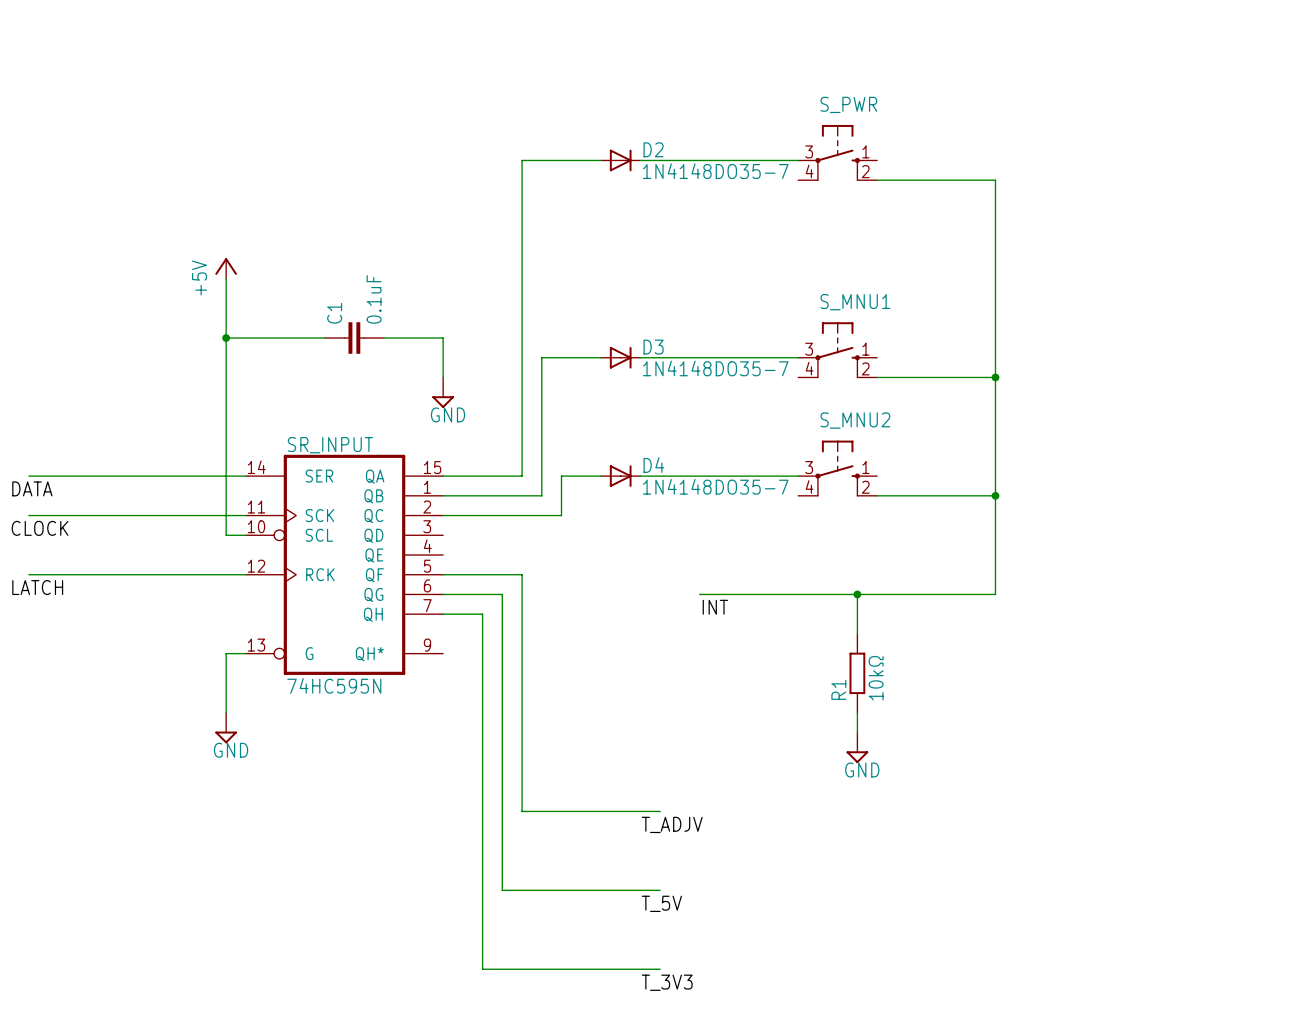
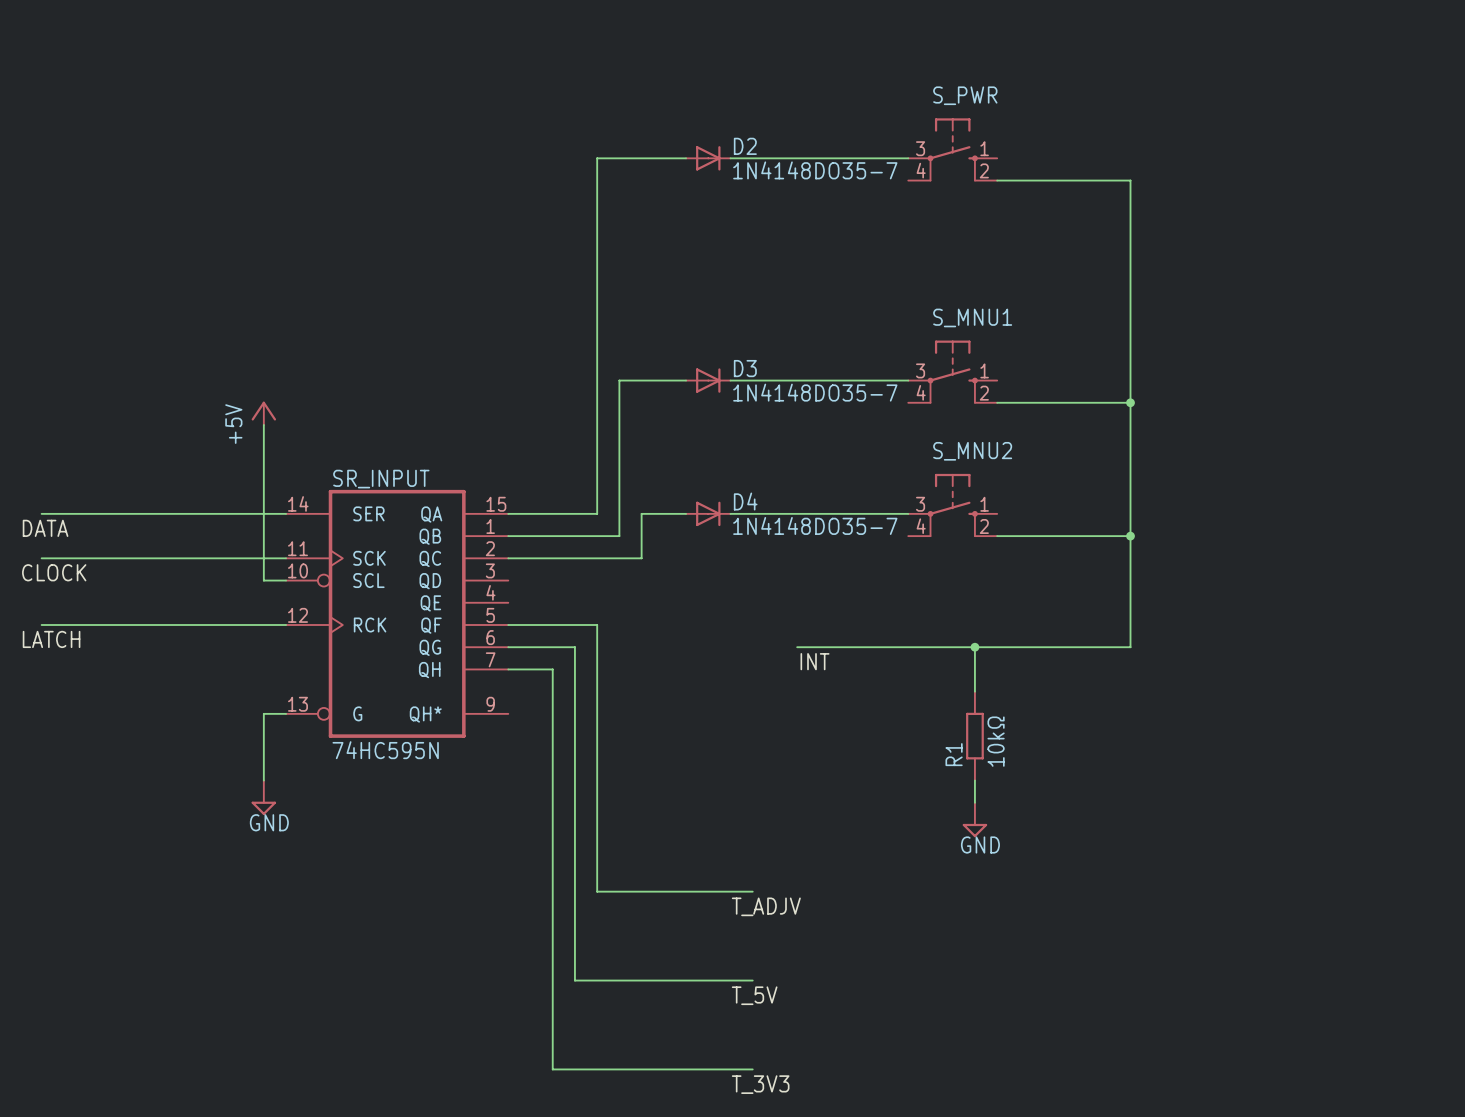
power symbol position: +5V (226, 268) -> +5V (263, 413)
wire: (226, 278) (226, 397) -> none
wire: (226, 338) (324, 338) -> none
junction: (226, 338) -> none
C1: 0.1uF (354, 338) -> none
wire: (383, 338) (443, 338) (443, 377) -> none
power symbol: GND (443, 392) -> none

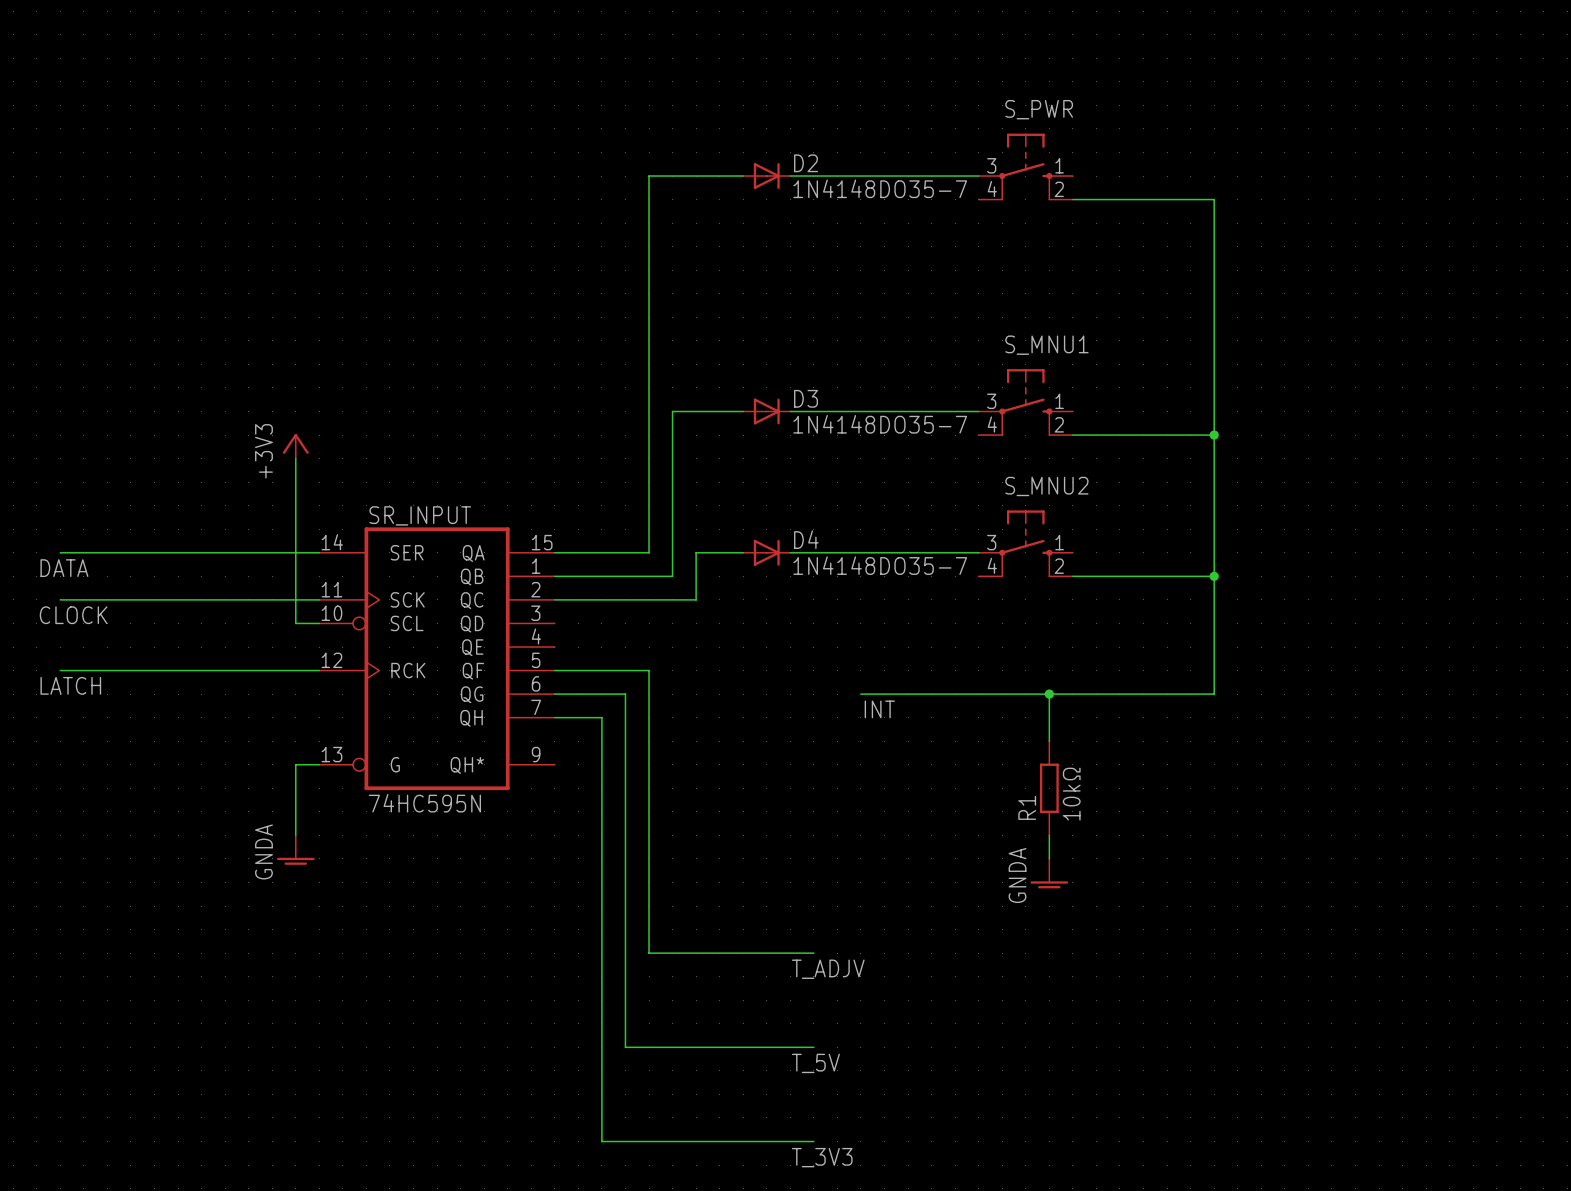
power symbol: +5V (263, 413) -> +3V3 (295, 446)
power symbol: GND (263, 797) -> GNDA (295, 850)
power symbol: GND (974, 819) -> GNDA (1049, 873)

